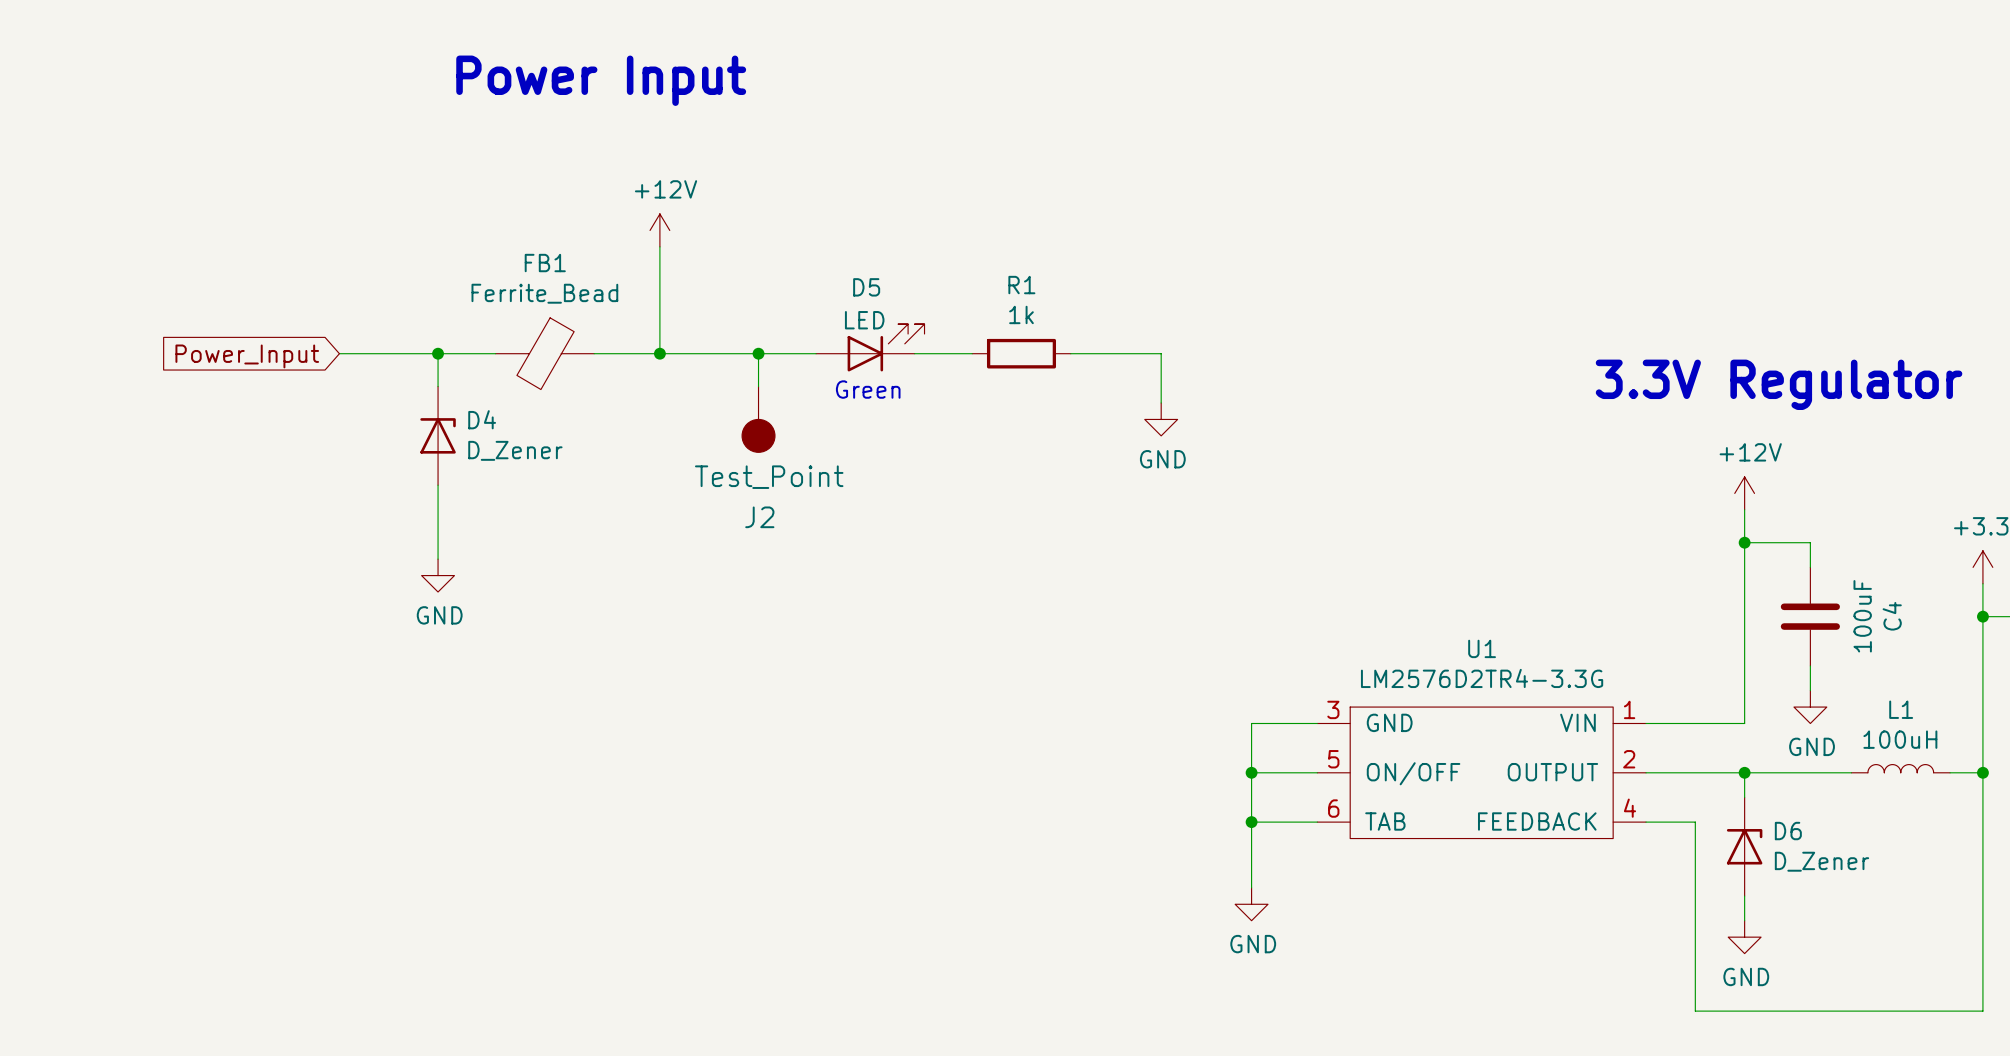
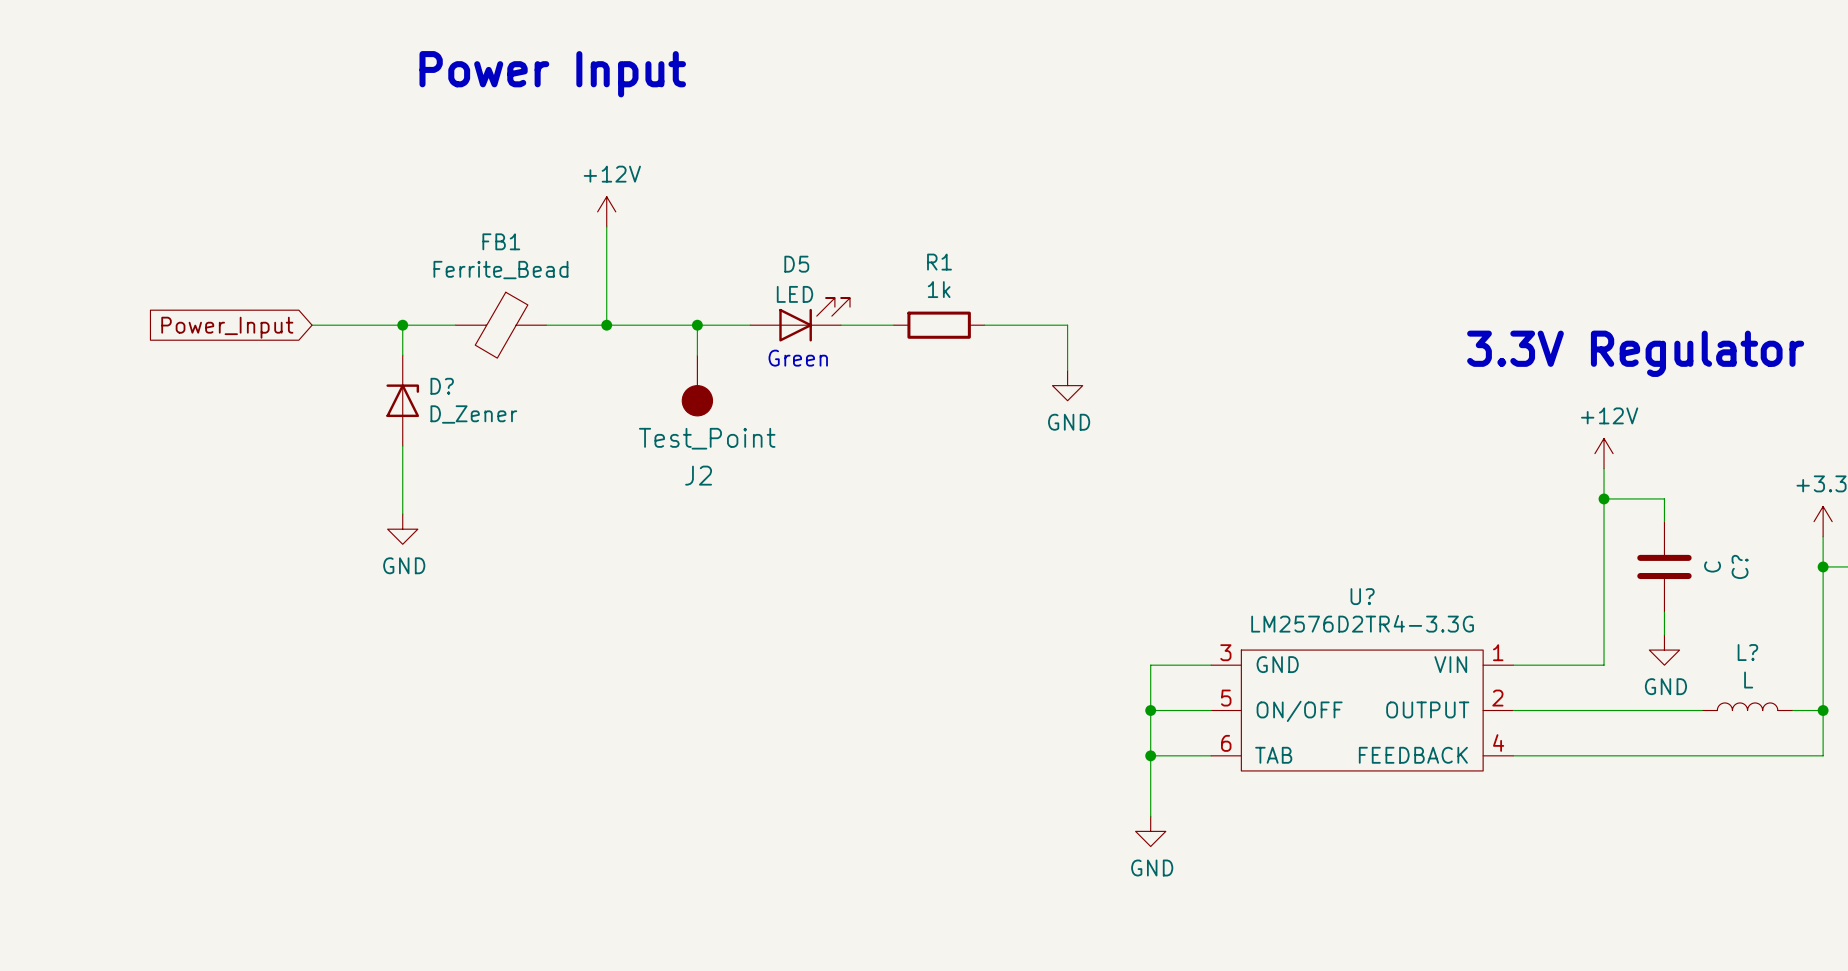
D4 name: D4 (482, 419) -> D? (442, 386)
C4 value: 100uF (1862, 616) -> C (1712, 566)
C4 name: C4 (1892, 616) -> C? (1740, 566)
U1 name: U1 (1482, 648) -> U? (1362, 596)
L1 name: L1 (1901, 709) -> L? (1747, 652)
L1 value: 100uH (1900, 739) -> L (1748, 680)
wire: (1744, 772) (1744, 797) -> none
junction: (1744, 772) -> none
wire: (1695, 822) (1695, 1011) (1982, 1011) (1982, 822) -> (1558, 755) (1823, 755)
D6: D_Zener (1744, 846) -> none
wire: (1744, 896) (1744, 920) -> none
power symbol: GND (1744, 937) -> none

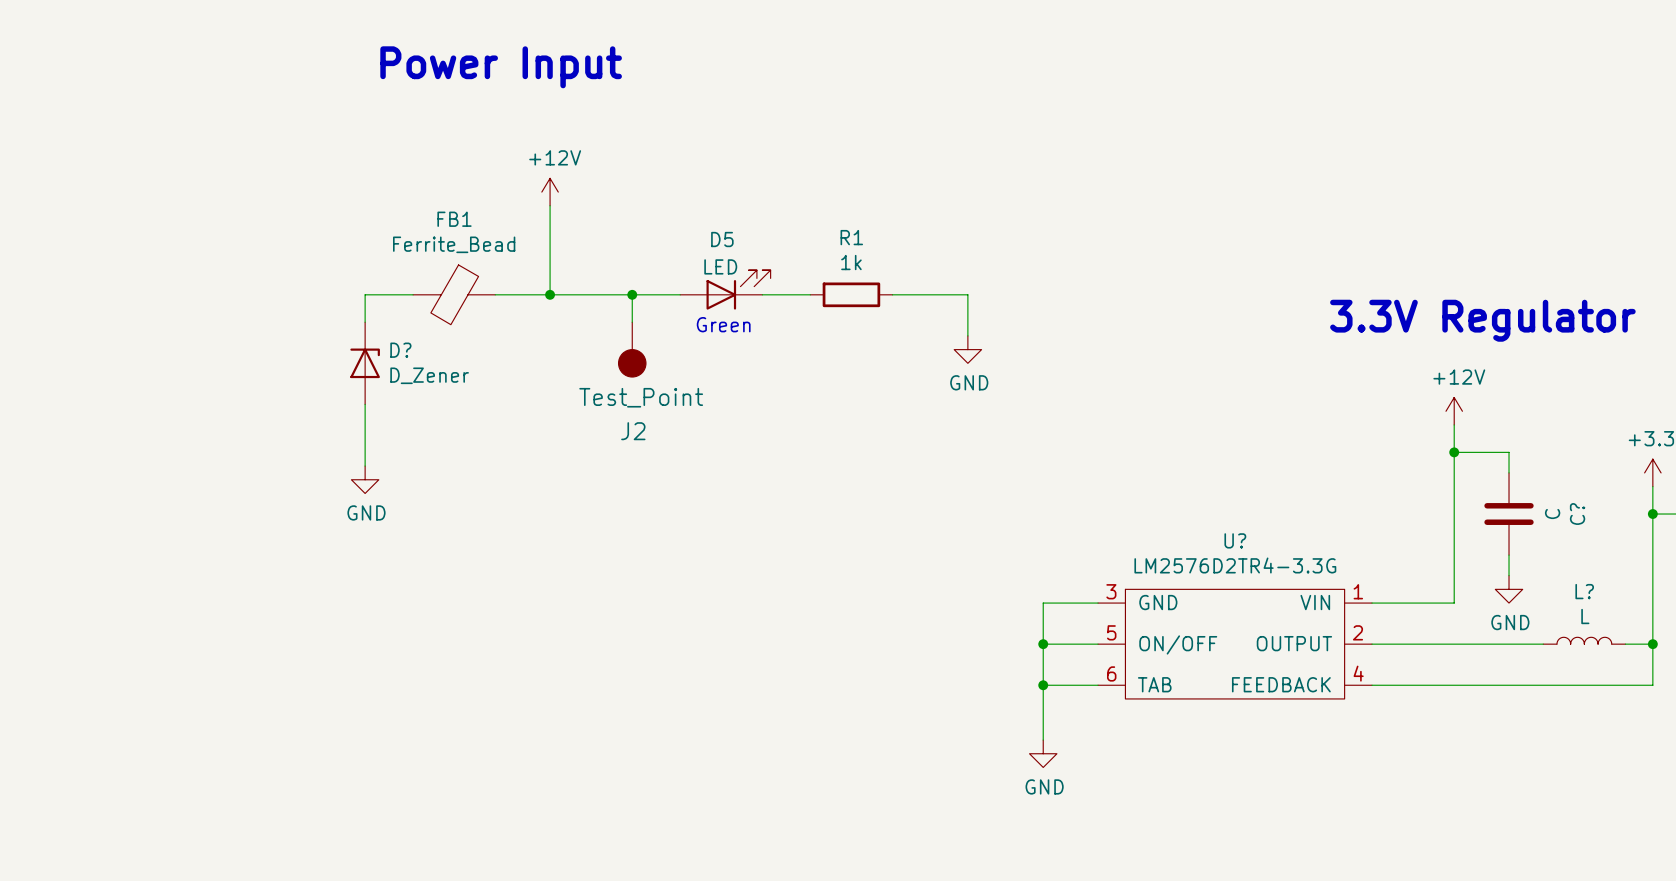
wire: (312, 325) (402, 325) -> none
junction: (402, 325) -> none
global label: Power_Input (227, 327) -> none

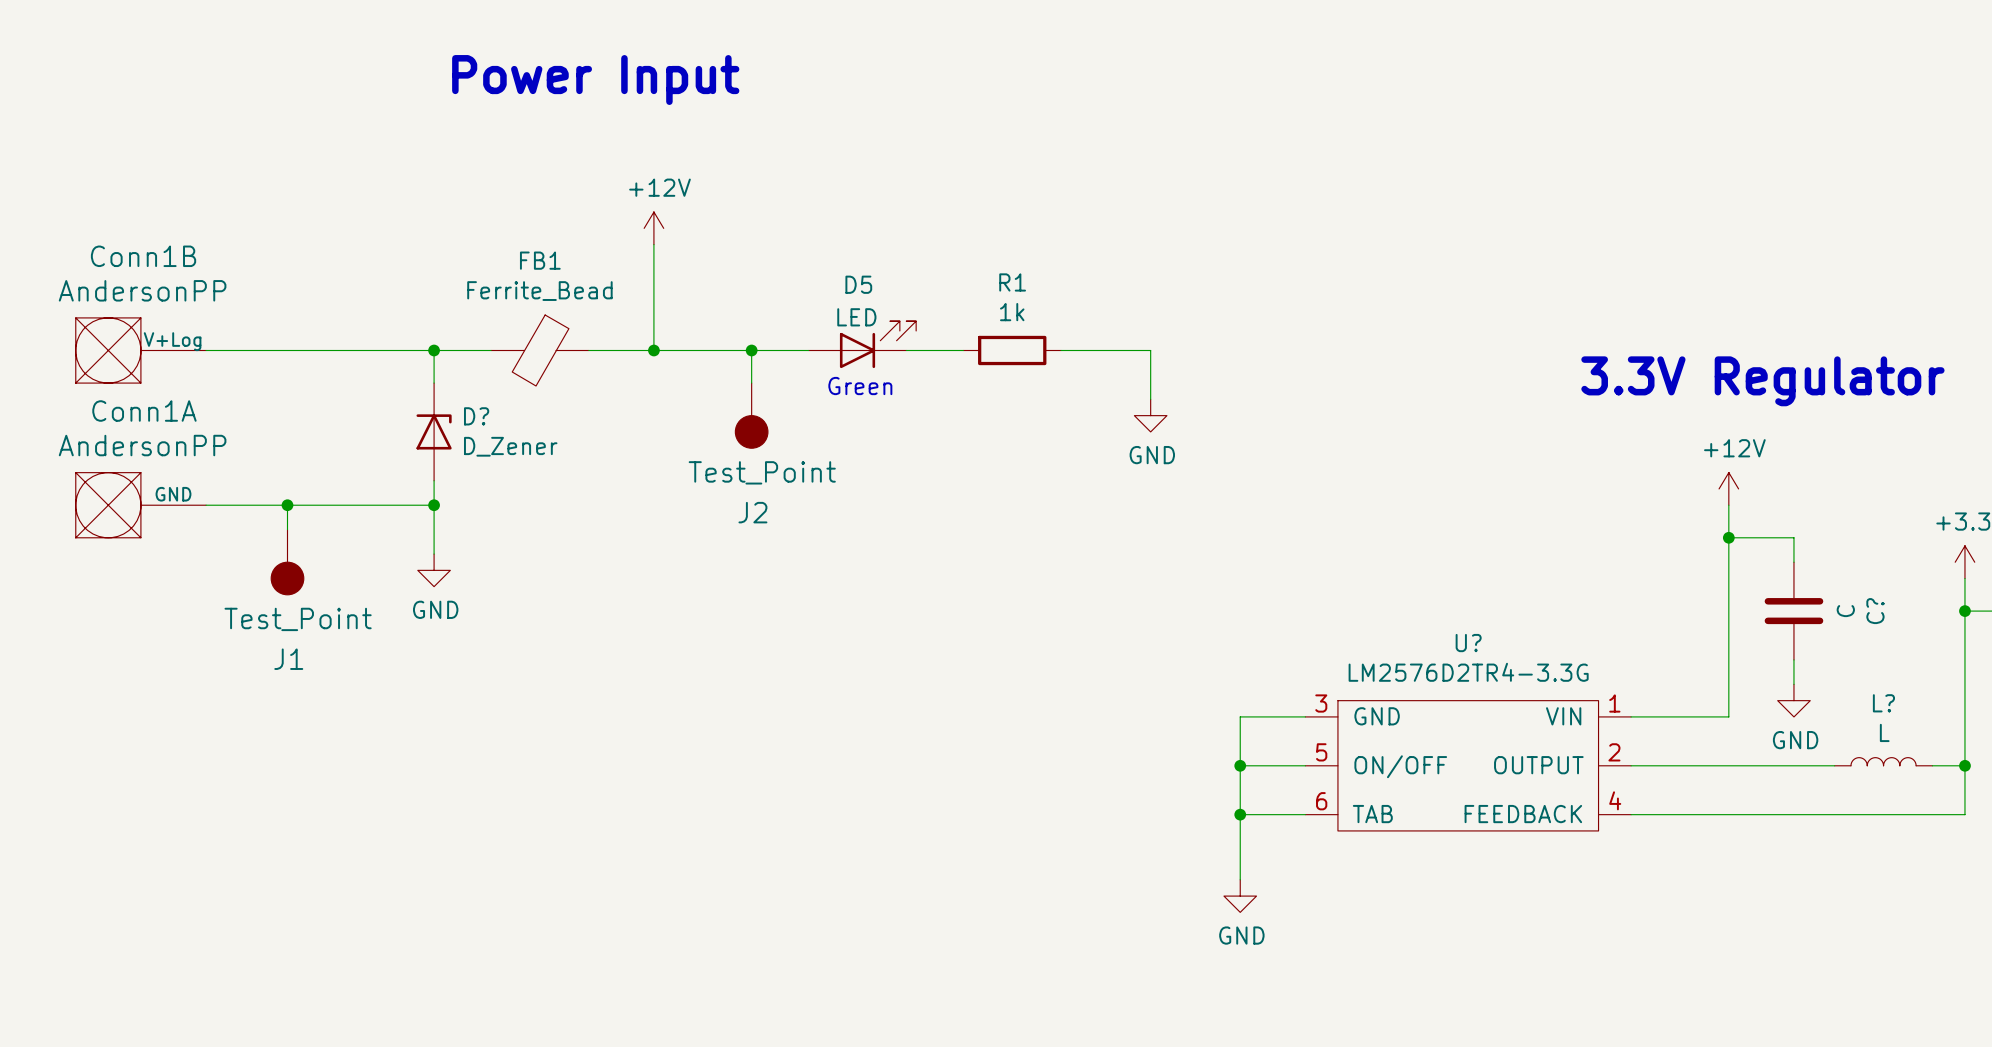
Conn1B: none -> AndersonPP (140, 350)
wire: none -> (206, 350) (434, 350)
junction: none -> (434, 350)
Conn1A: none -> AndersonPP (140, 505)
wire: none -> (206, 505) (434, 505)
wire: none -> (287, 505) (287, 529)
junction: none -> (287, 505)
junction: none -> (434, 505)
J1: none -> Test_Point (287, 562)

